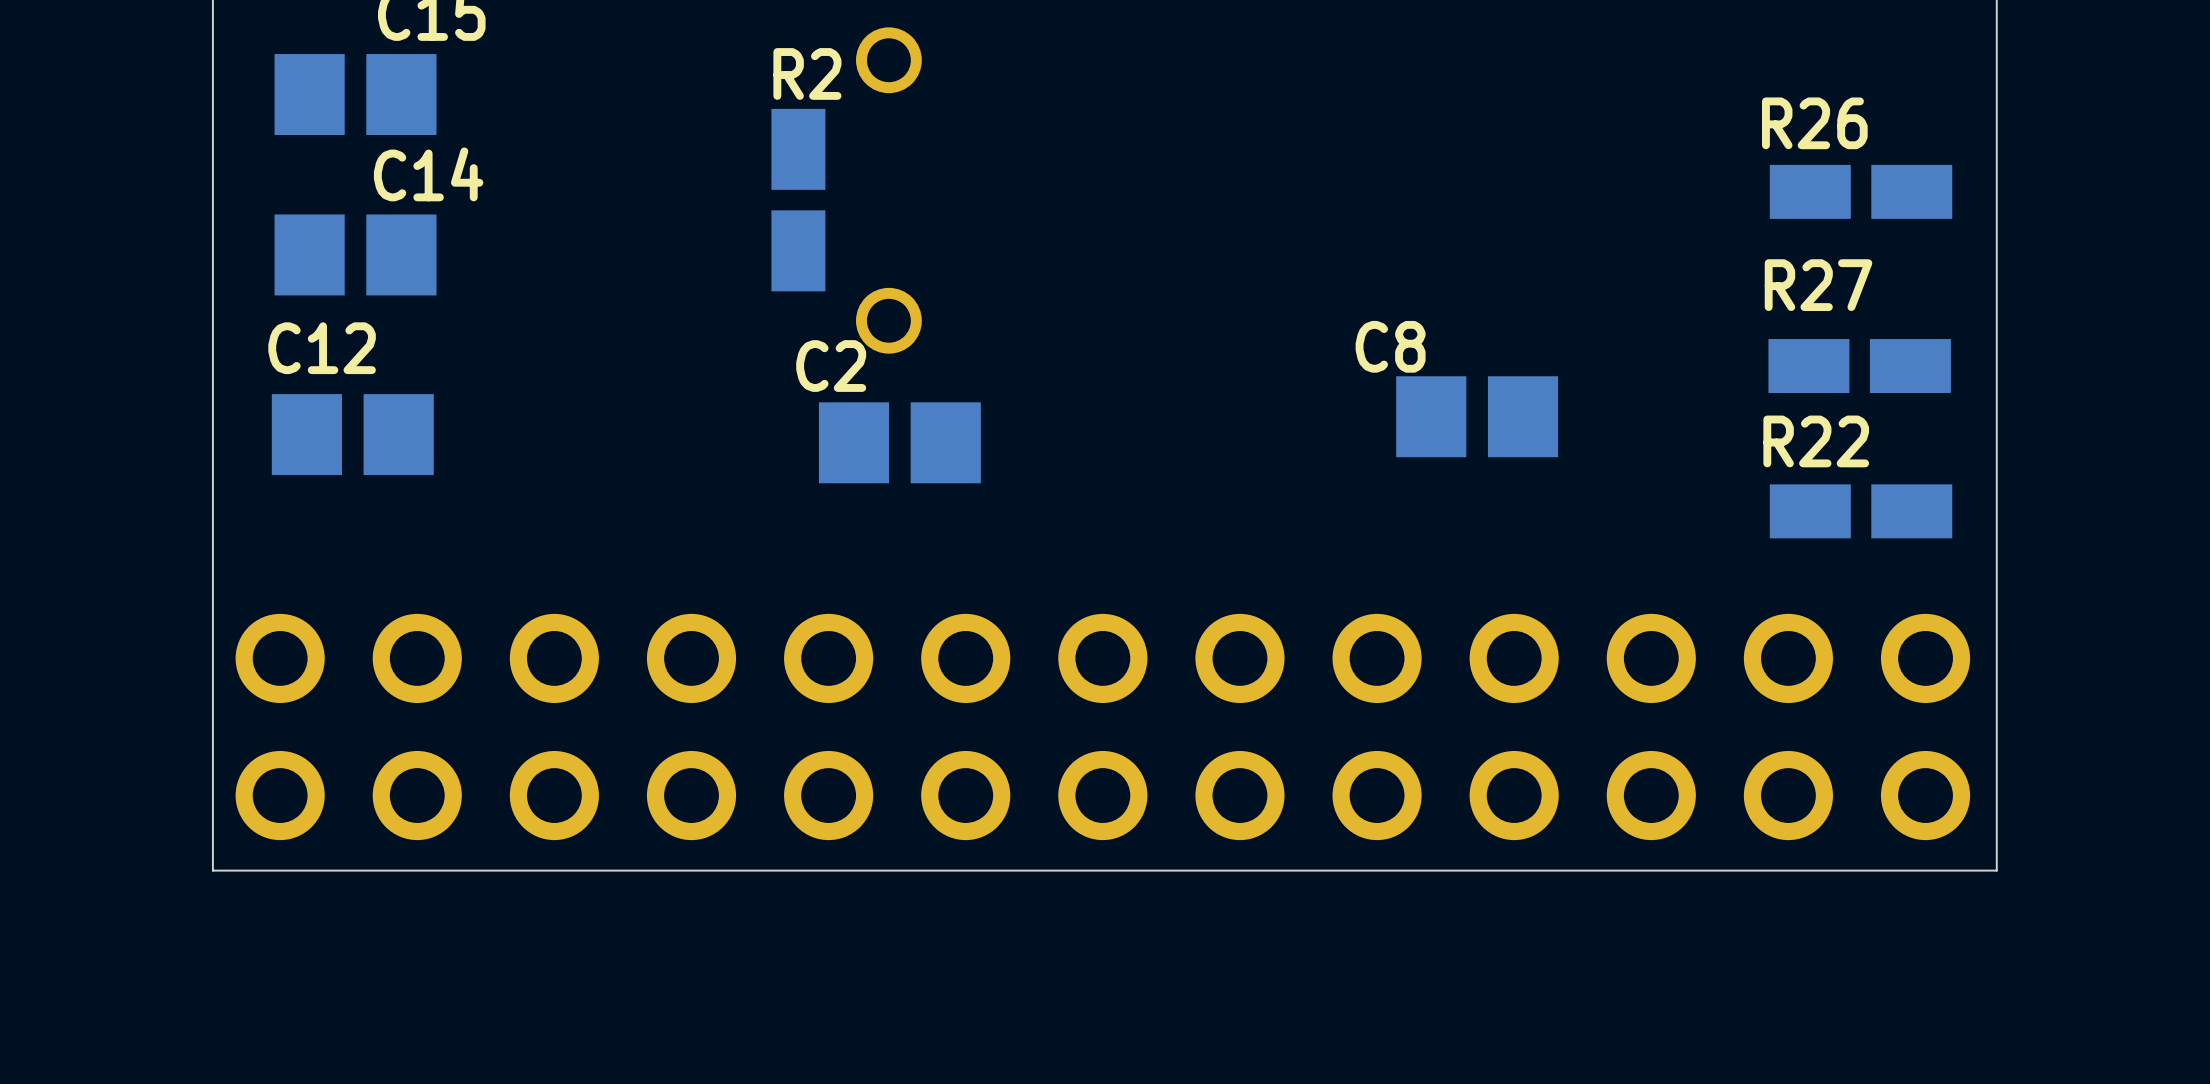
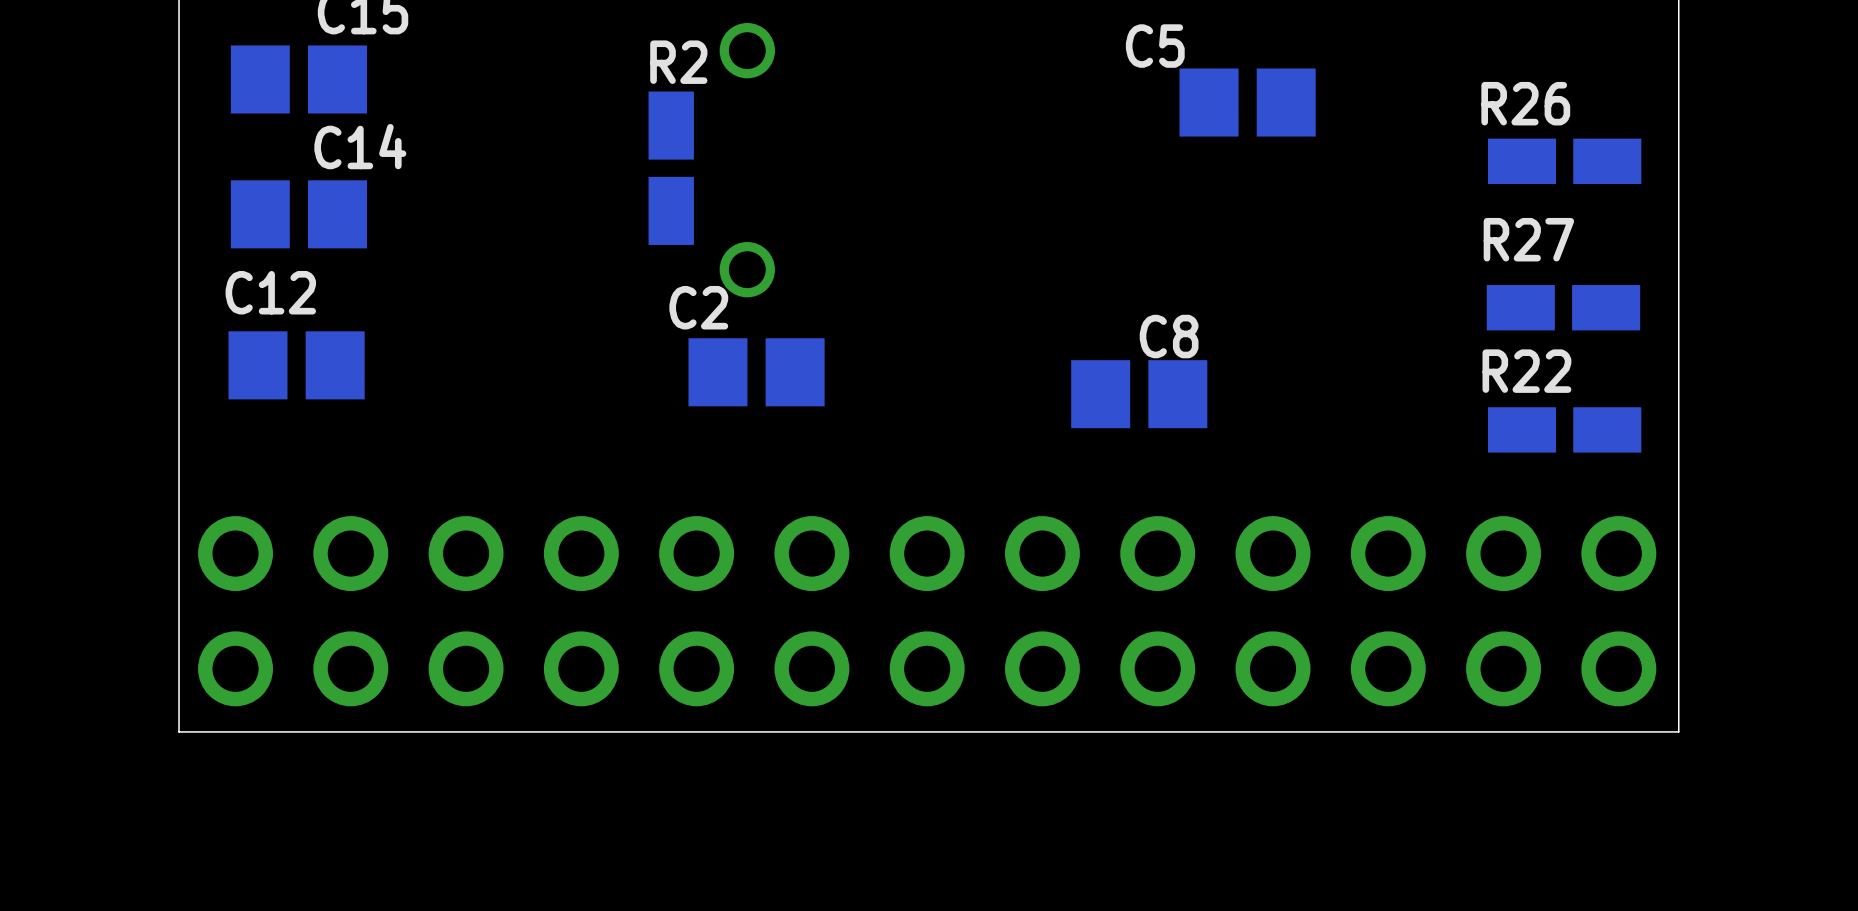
C5: none -> (1247, 102)
C8 name position: C8 (1390, 346) -> C8 (1169, 336)
C8 position: (1477, 416) -> (1139, 394)

